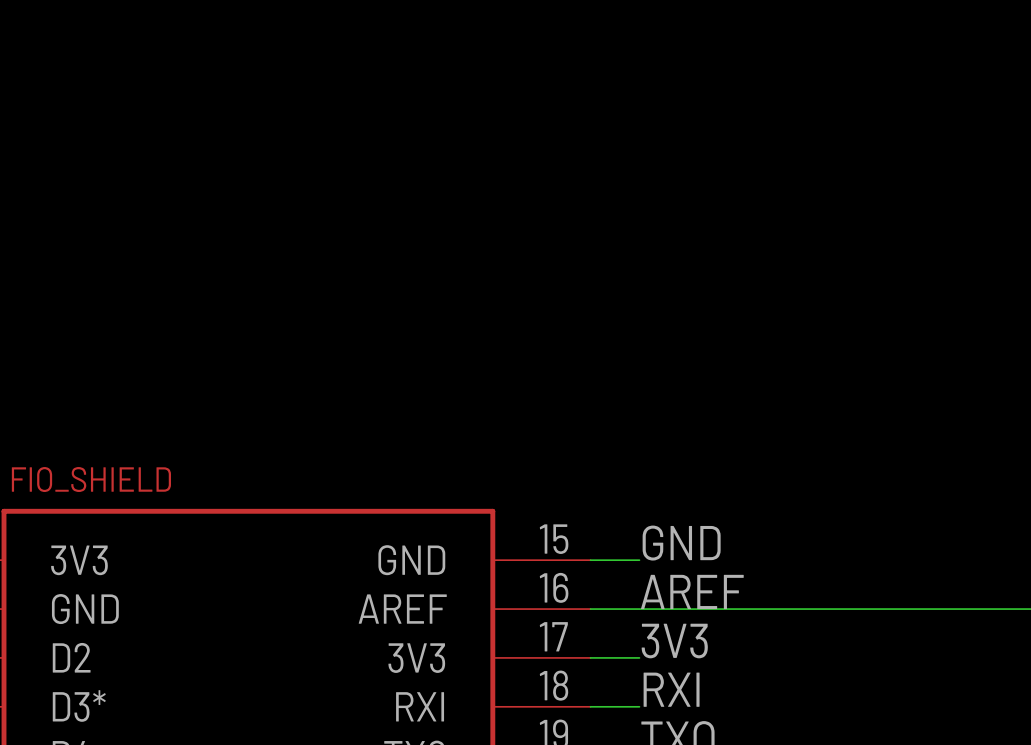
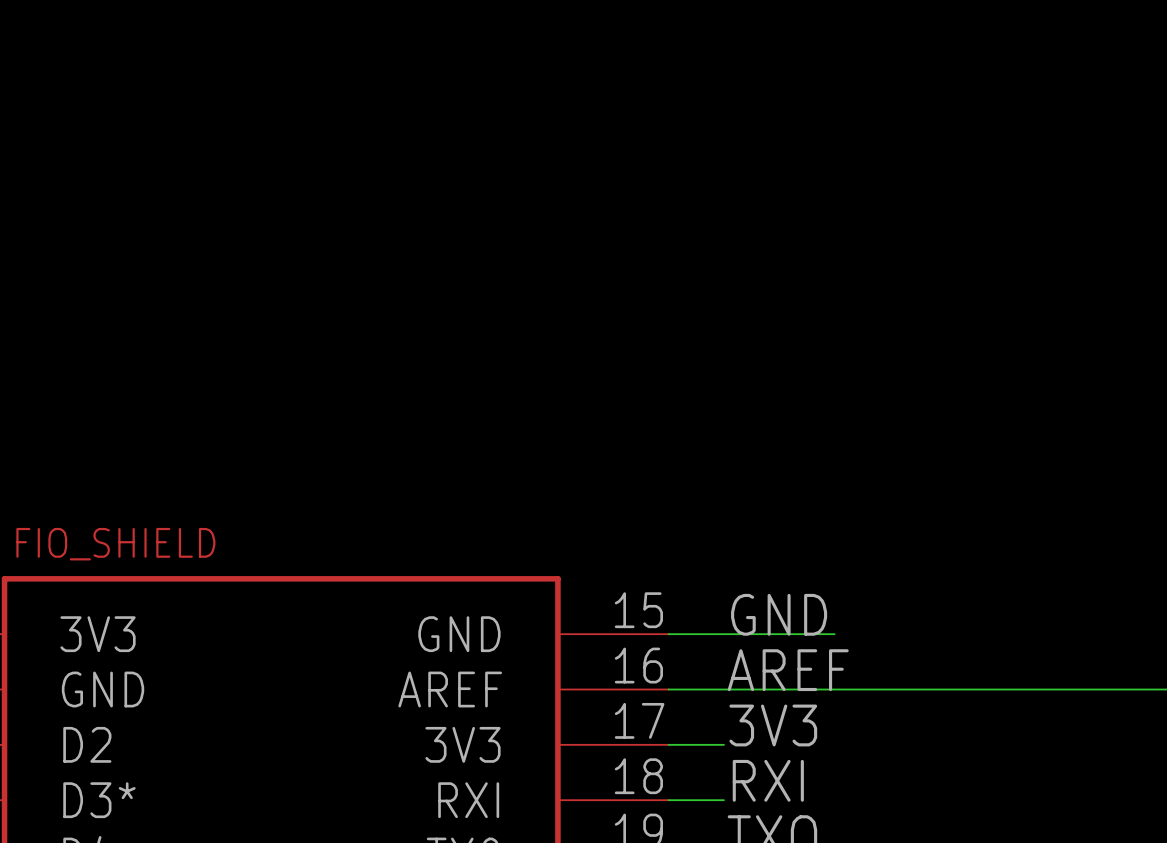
wire: none -> (723, 634) (834, 634)

